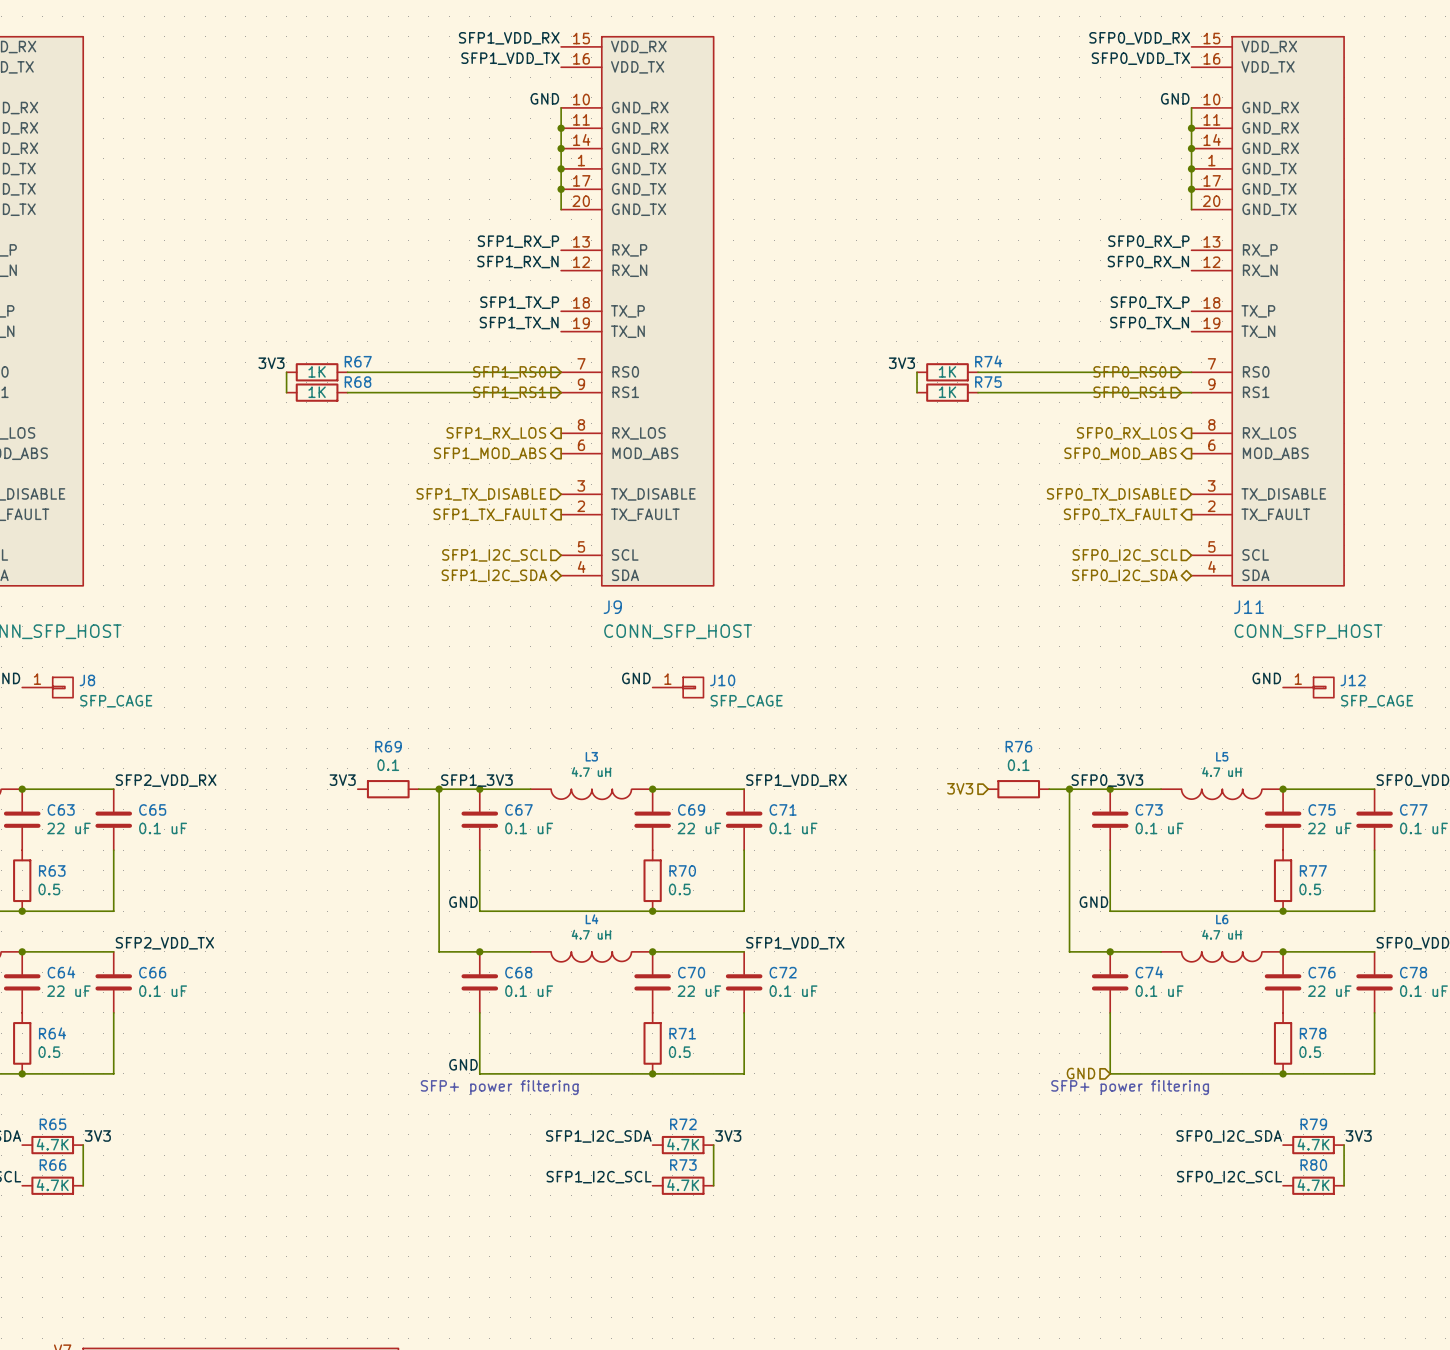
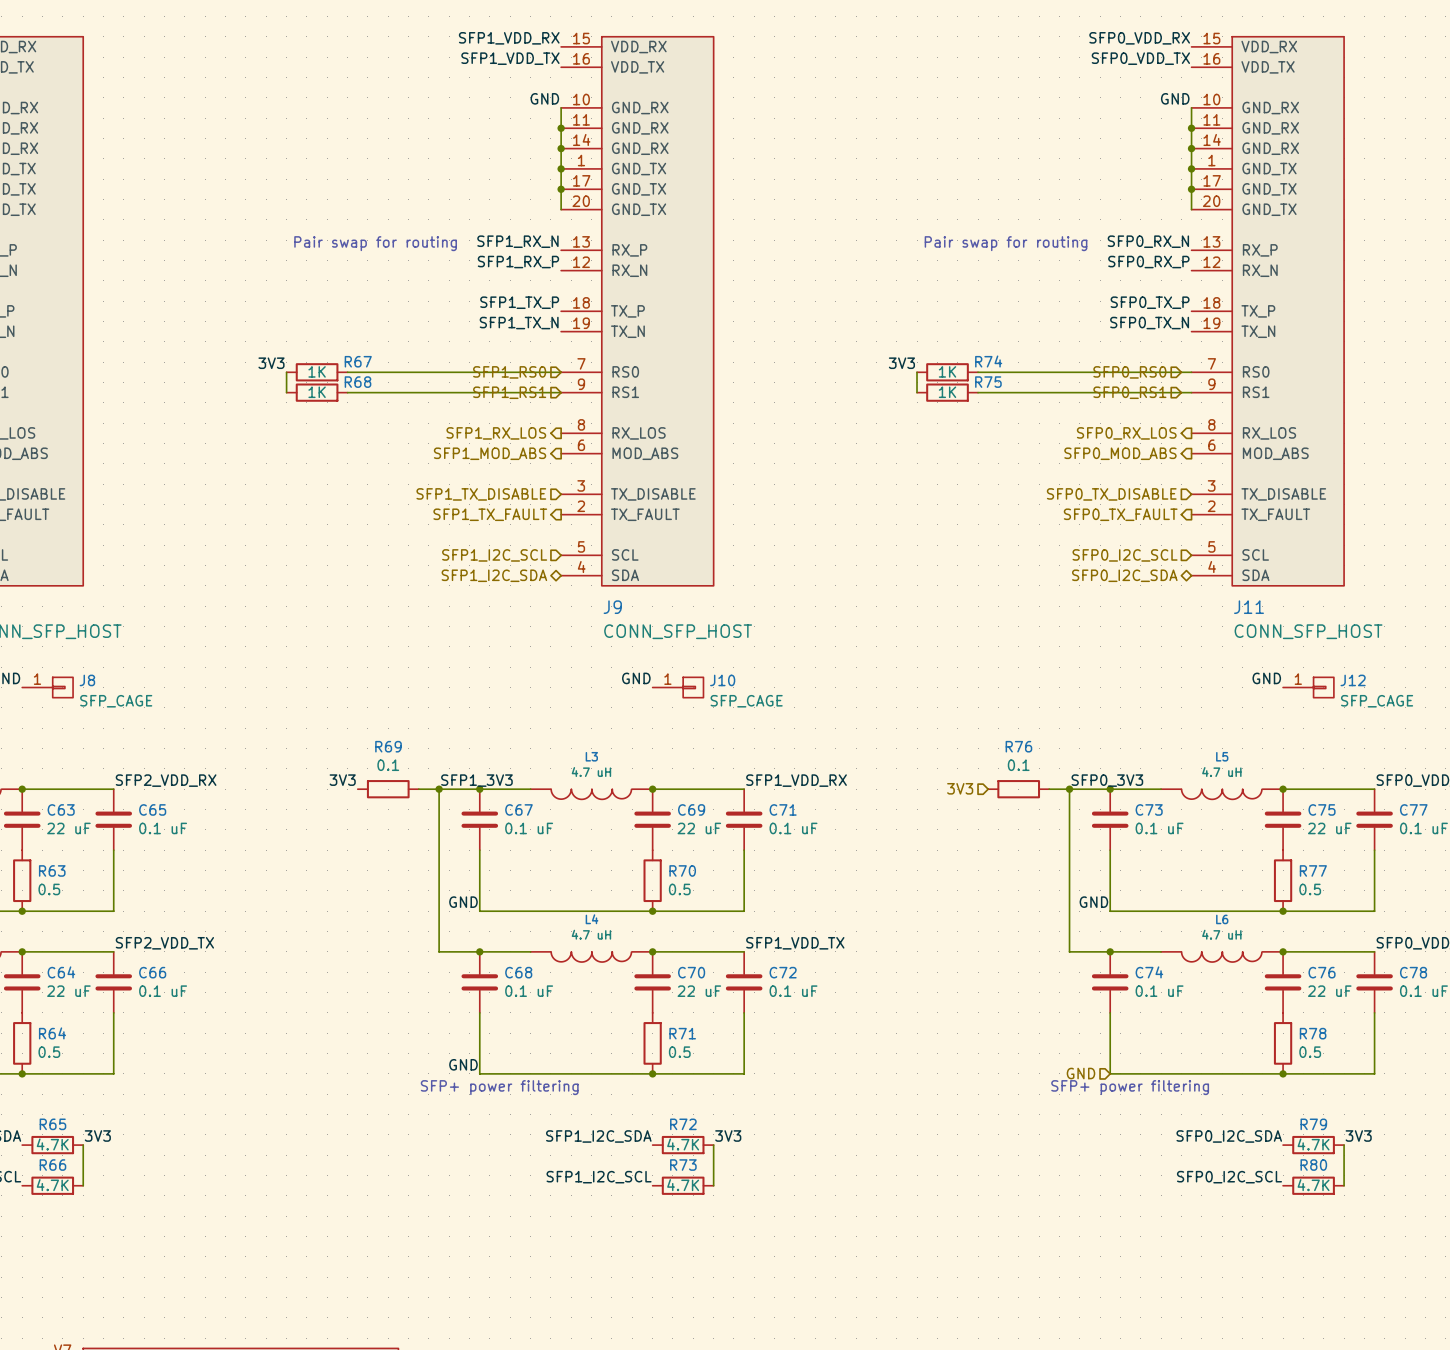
label: SFP1_RX_P (518, 241) -> SFP1_RX_N (517, 241)
label: SFP0_RX_P (1148, 241) -> SFP0_RX_N (1148, 241)
text: none -> Pair swap for routing (375, 243)
text: none -> Pair swap for routing (1006, 243)
label: SFP1_RX_N (517, 262) -> SFP1_RX_P (518, 262)
label: SFP0_RX_N (1148, 262) -> SFP0_RX_P (1148, 262)

